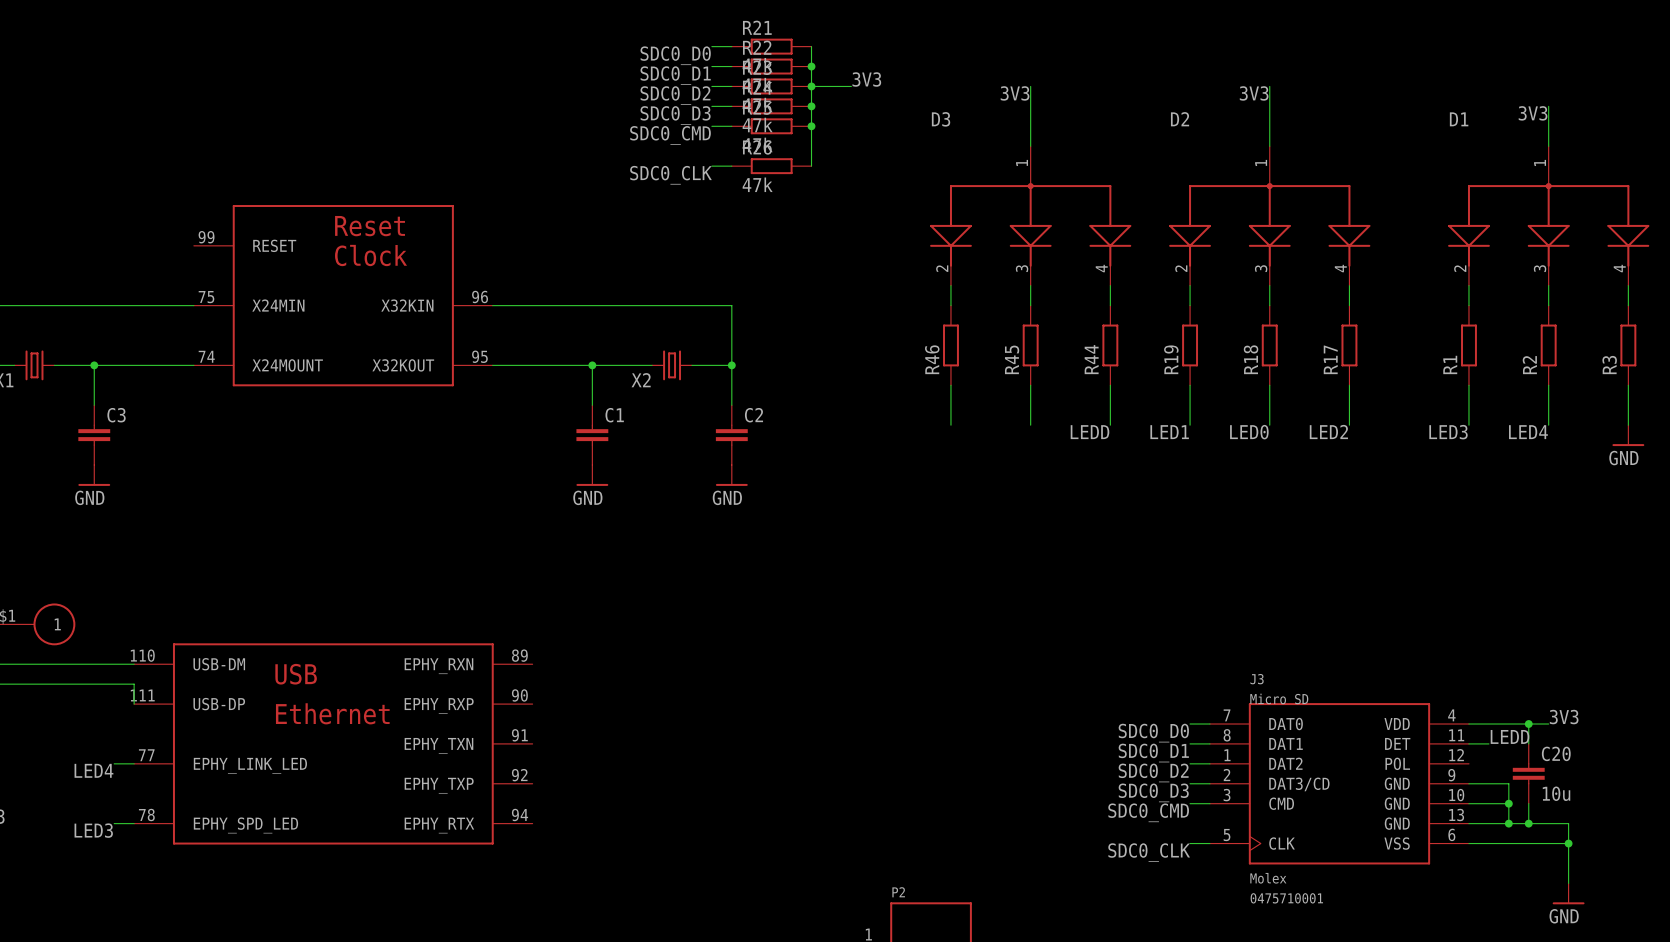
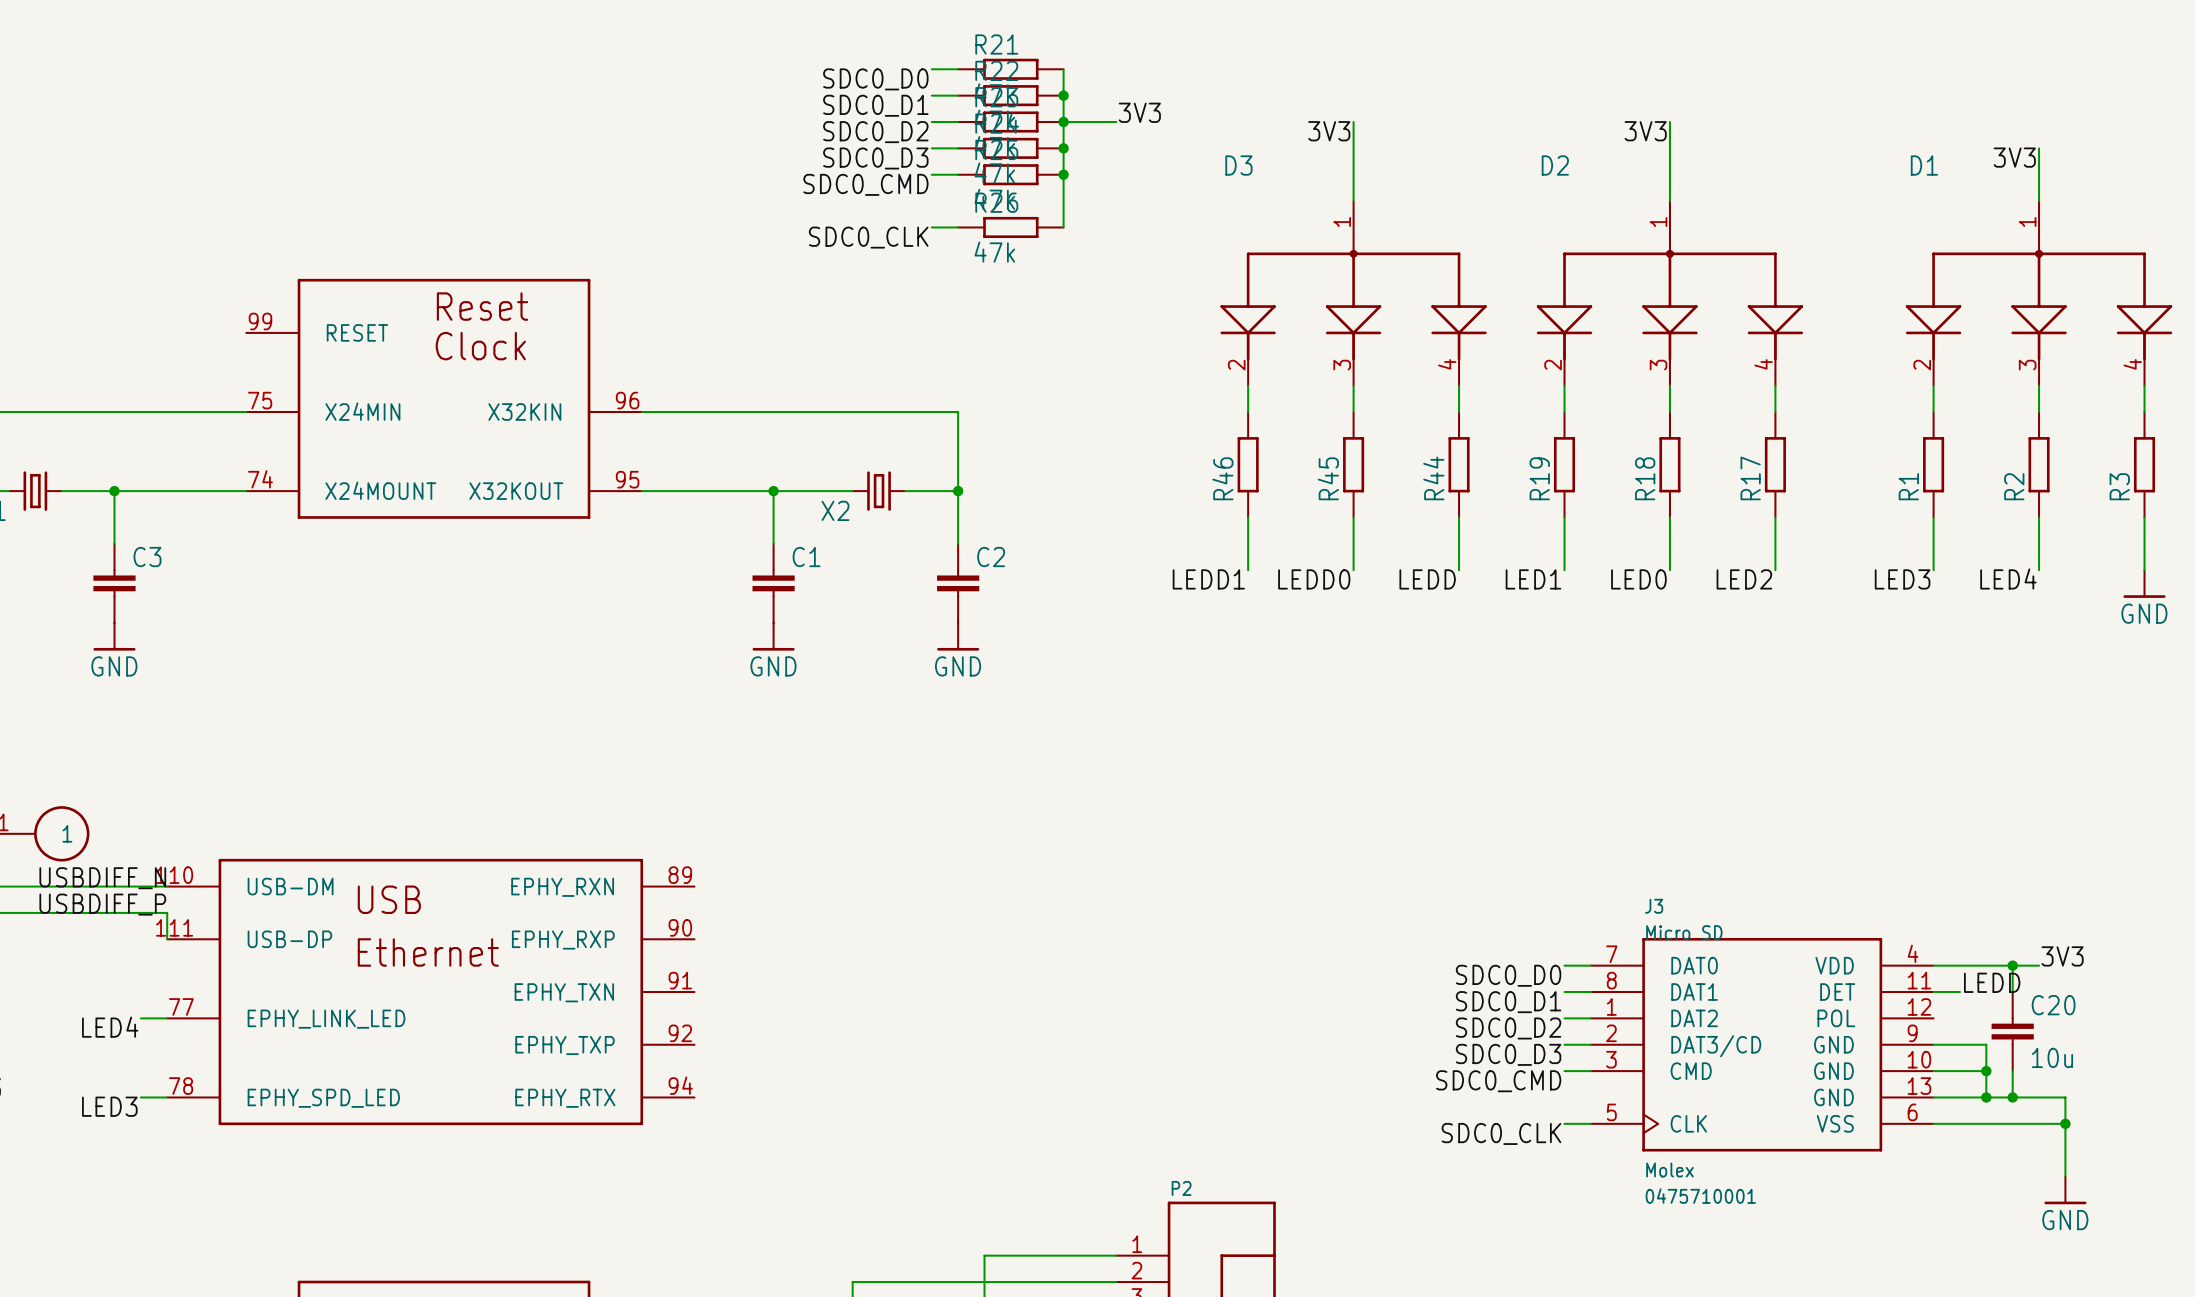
label: none -> LEDD1 (1208, 579)
label: none -> LEDD0 (1314, 579)
label: none -> USBDIFF_N (102, 878)
label: none -> USBDIFF_P (102, 904)

